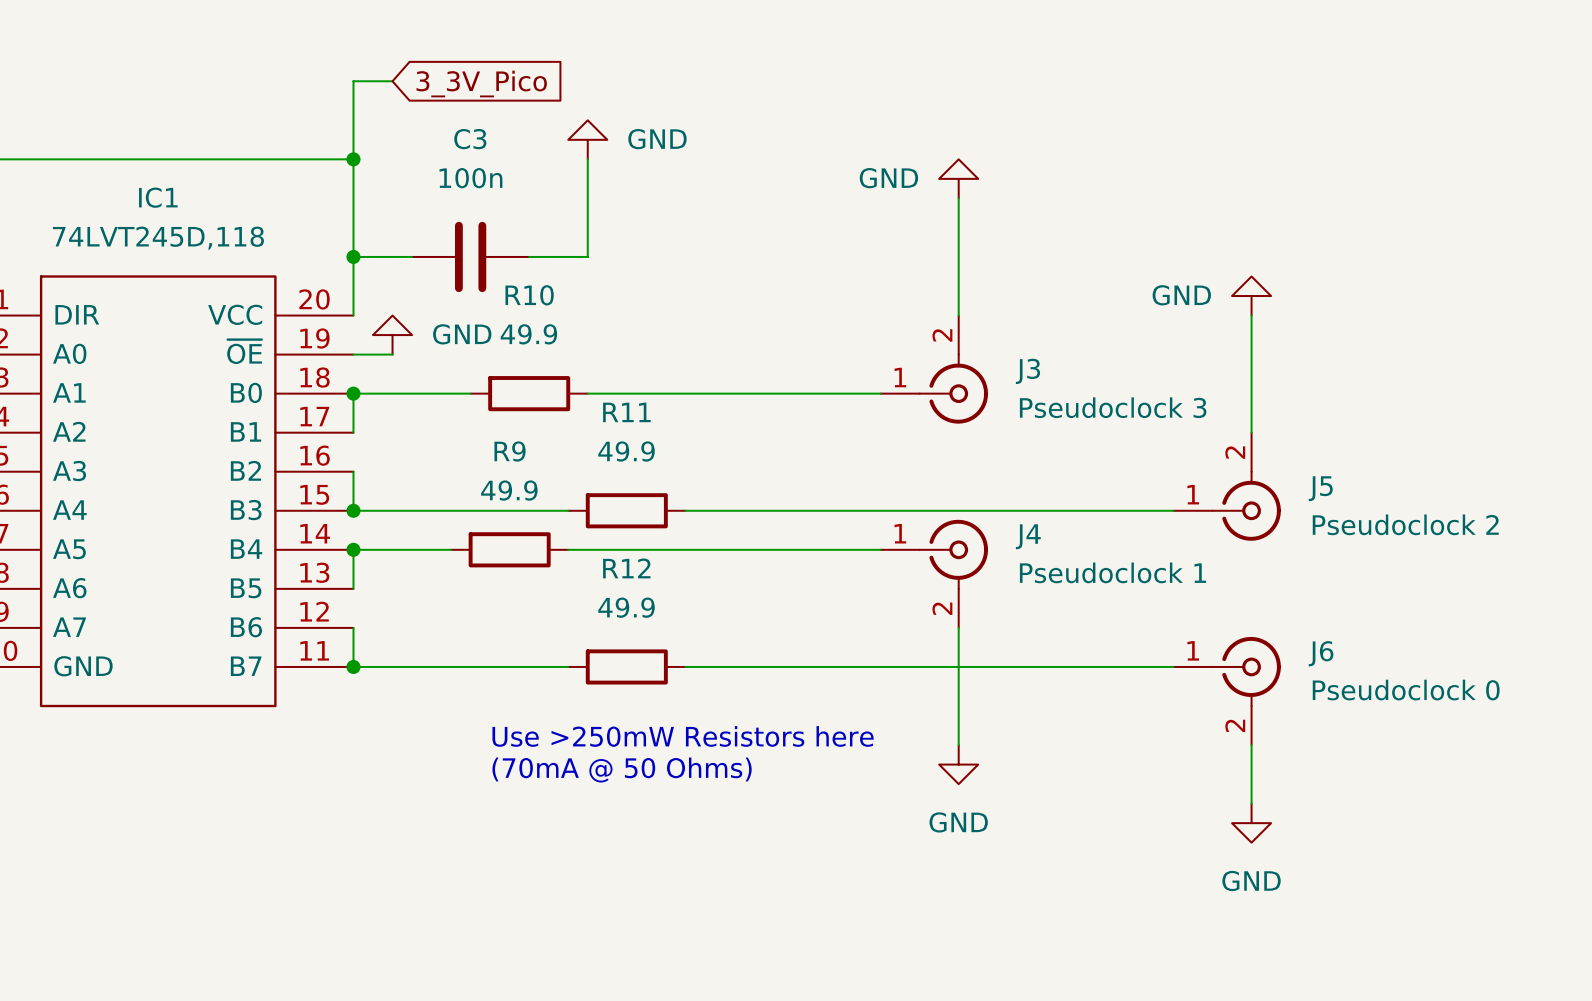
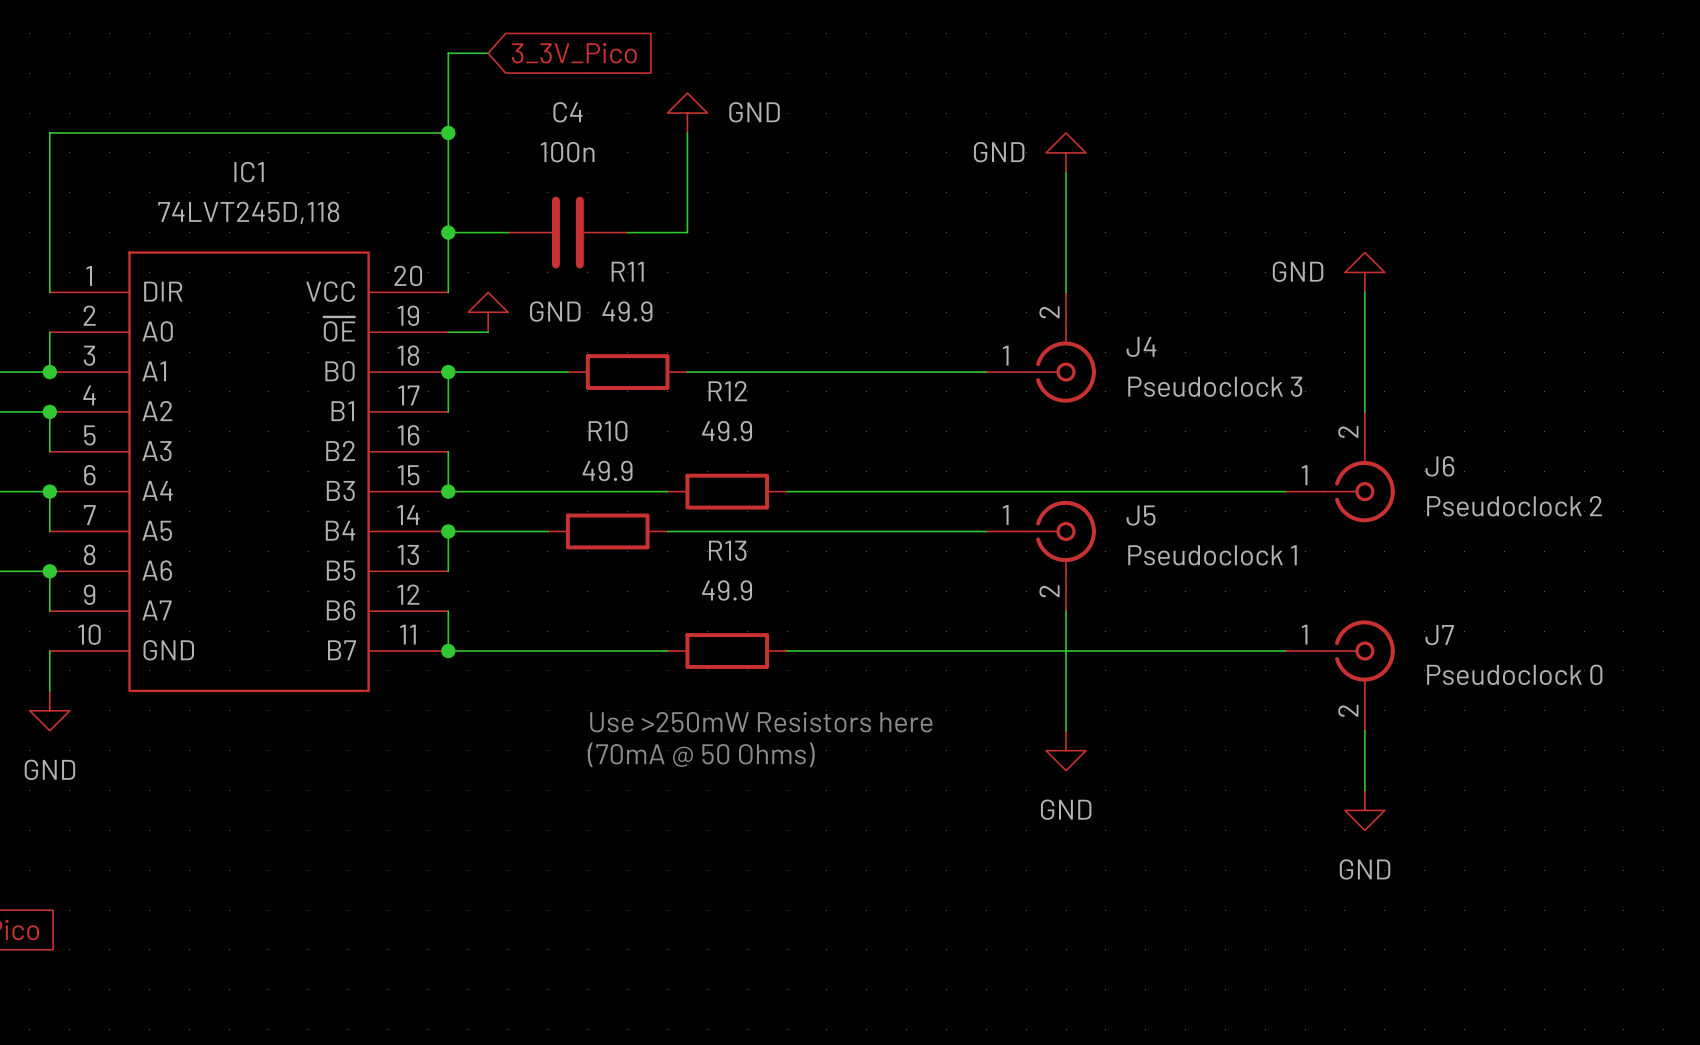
C3 name: C3 (470, 139) -> C4 (568, 112)
R10 name: R10 (529, 295) -> R11 (627, 271)
J3 name: J3 (1027, 371) -> J4 (1141, 346)
R11 name: R11 (626, 412) -> R12 (727, 391)
R9 name: R9 (510, 451) -> R10 (608, 431)
J5 name: J5 (1320, 488) -> J6 (1439, 466)
J4 name: J4 (1028, 536) -> J5 (1141, 515)
R12 name: R12 (626, 568) -> R13 (727, 550)
J6 name: J6 (1321, 653) -> J7 (1439, 635)

